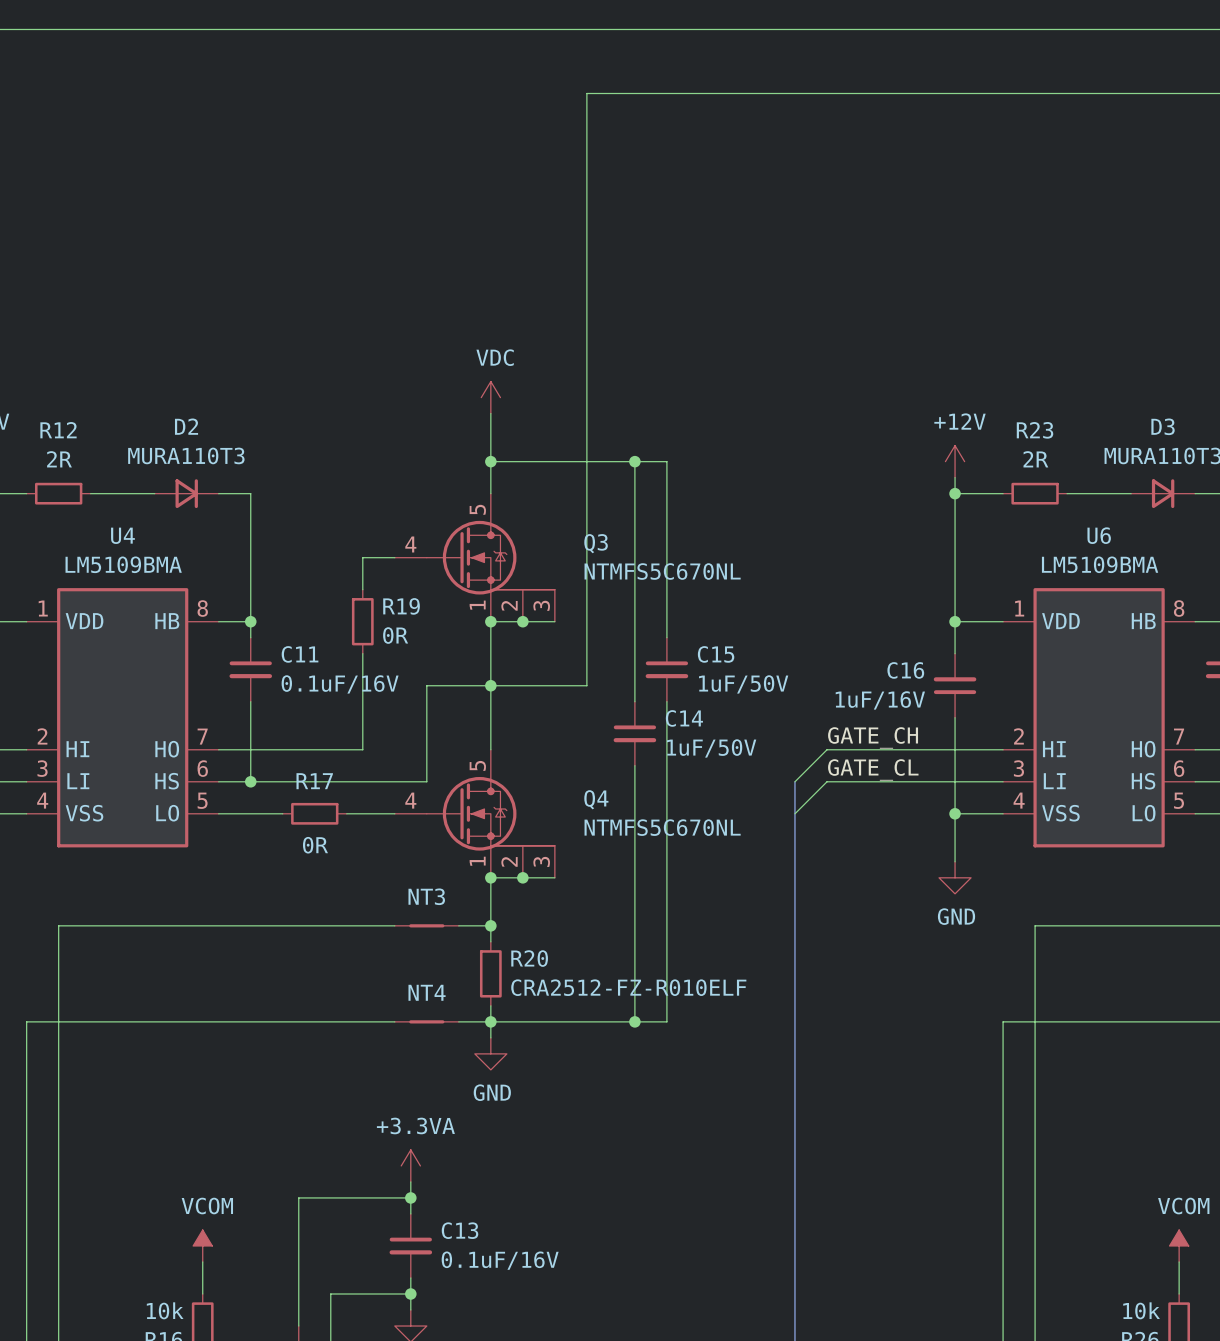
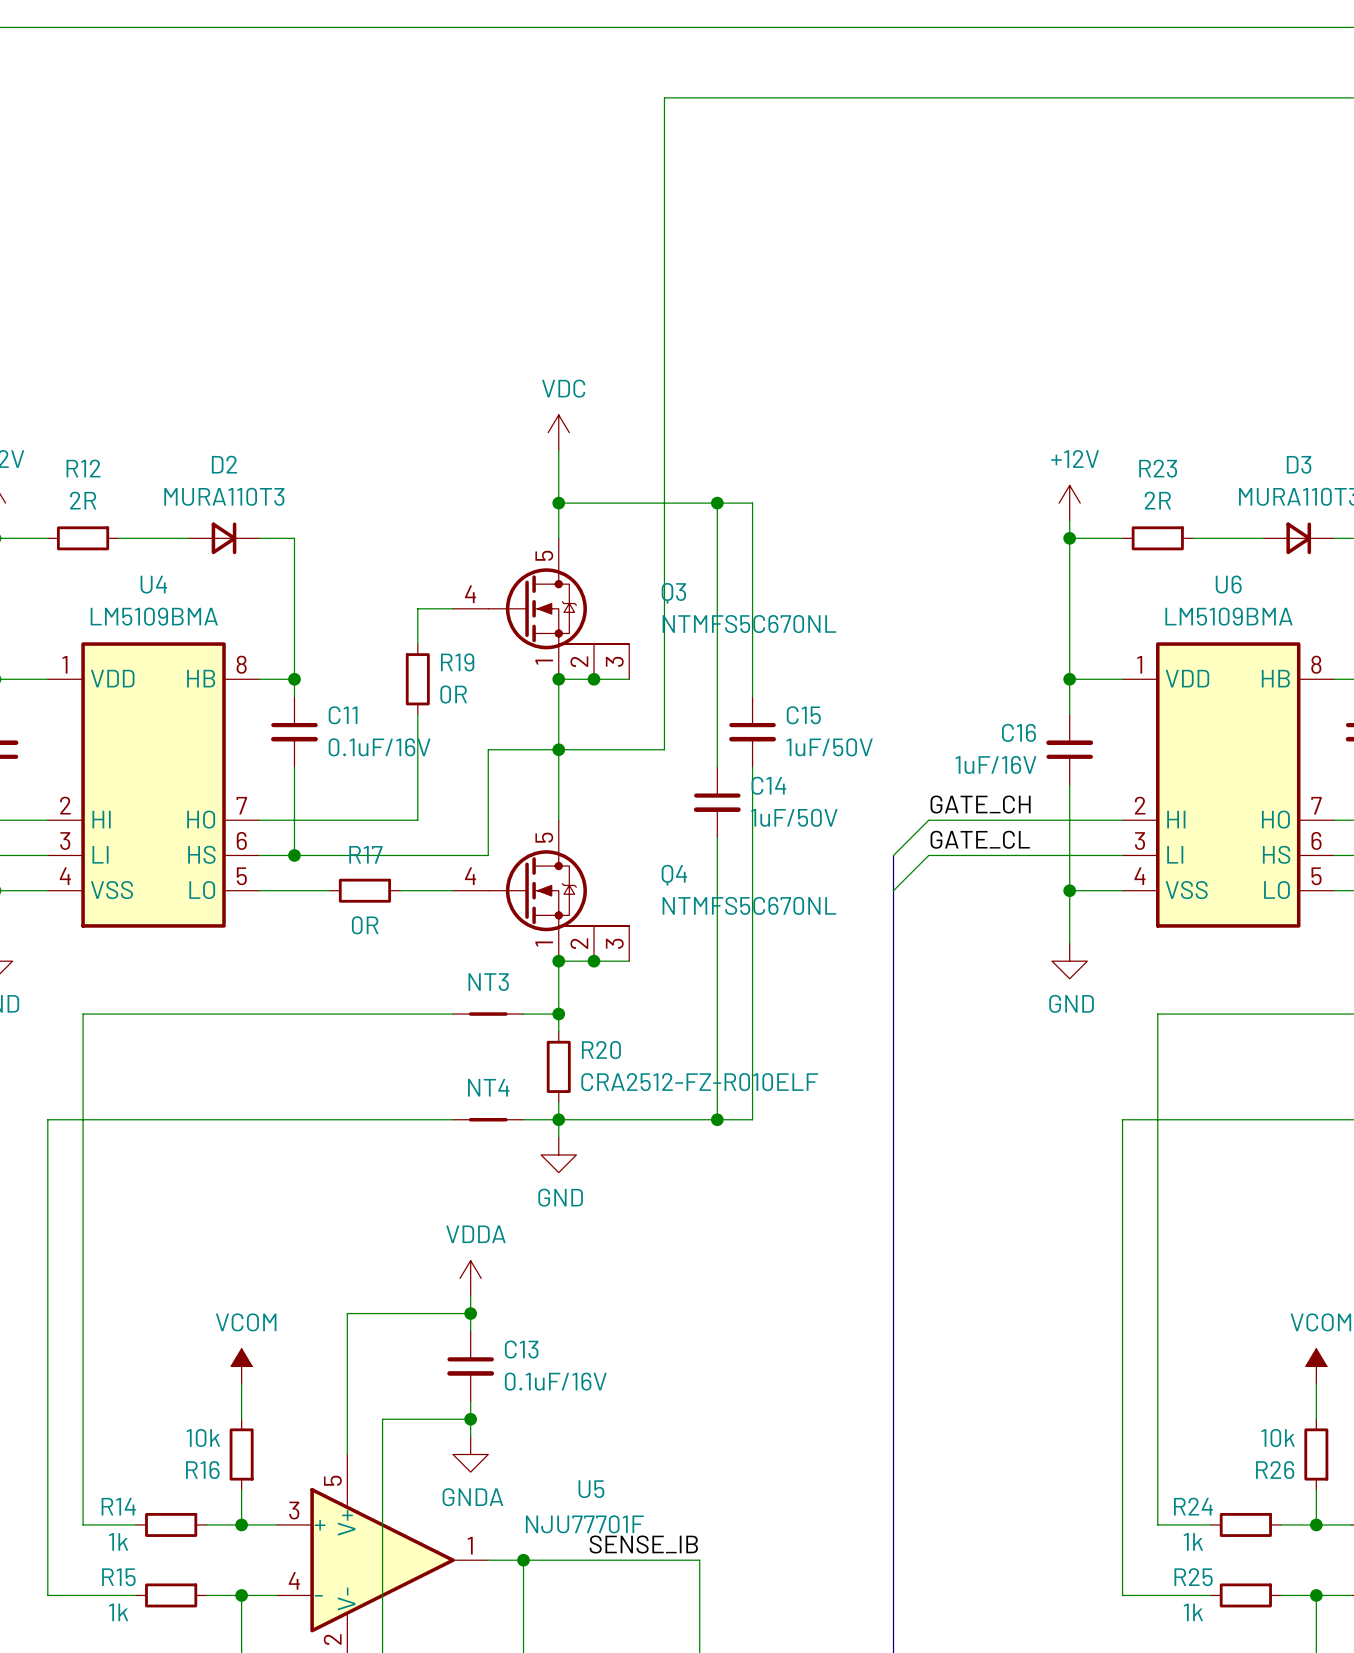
power symbol: +3.3VA (410, 1165) -> VDDA (470, 1278)

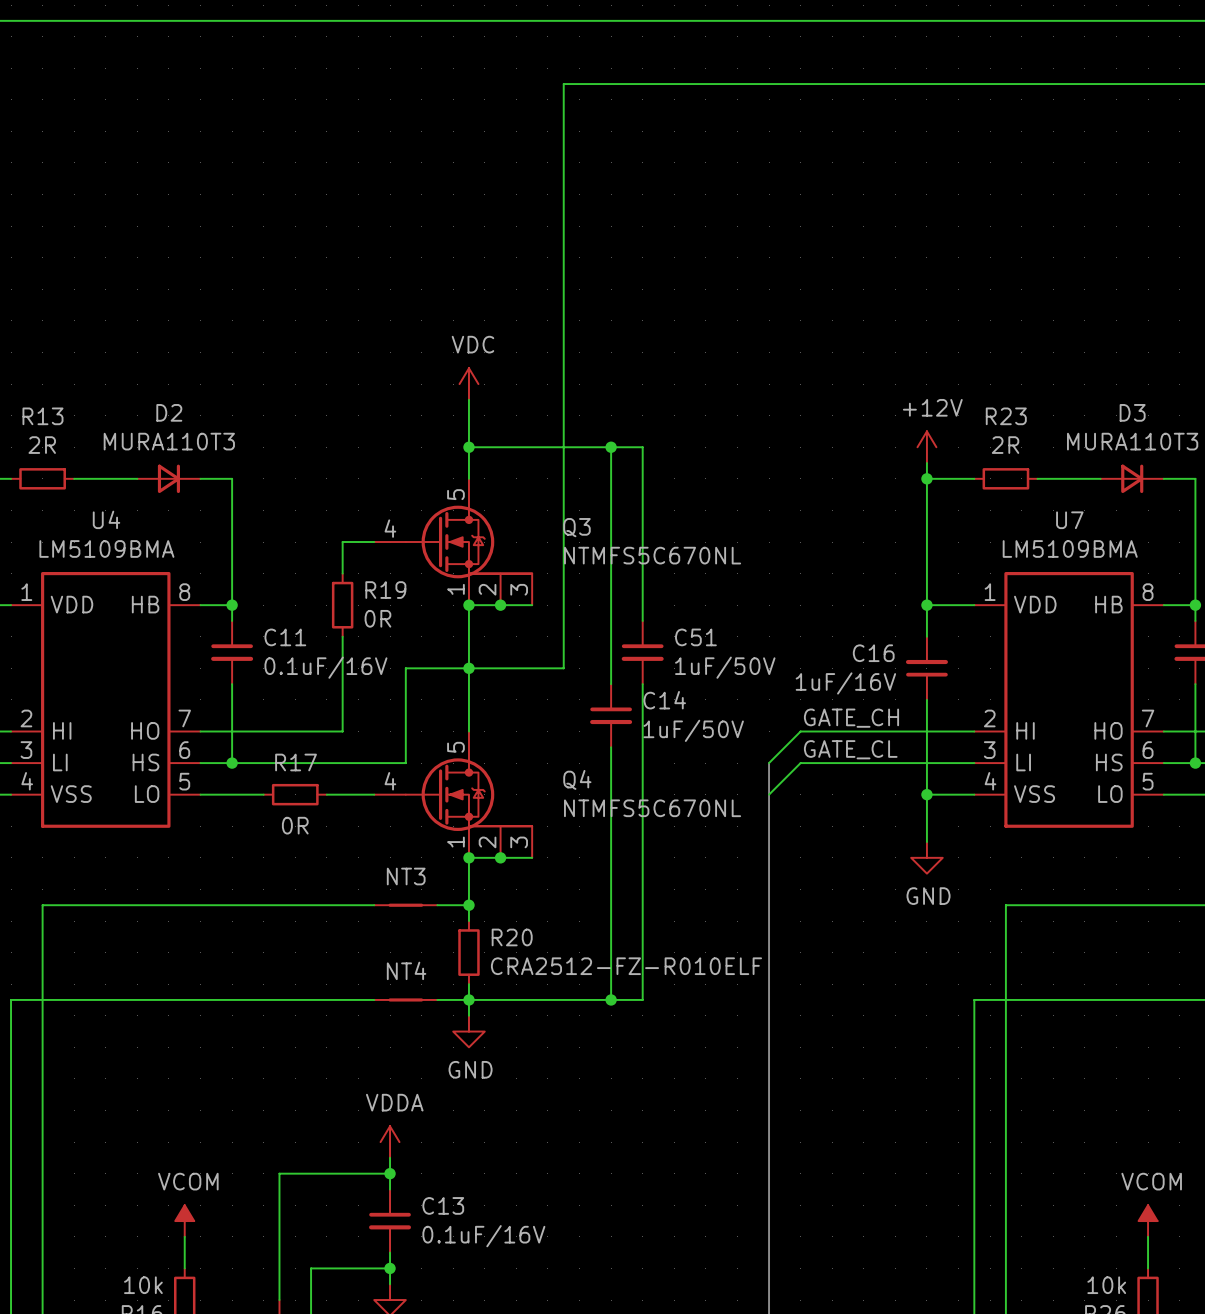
R12 name: R12 (83, 468) -> R13 (42, 416)
U6 name: U6 (1228, 584) -> U7 (1069, 520)
C15 name: C15 (803, 715) -> C51 (695, 637)

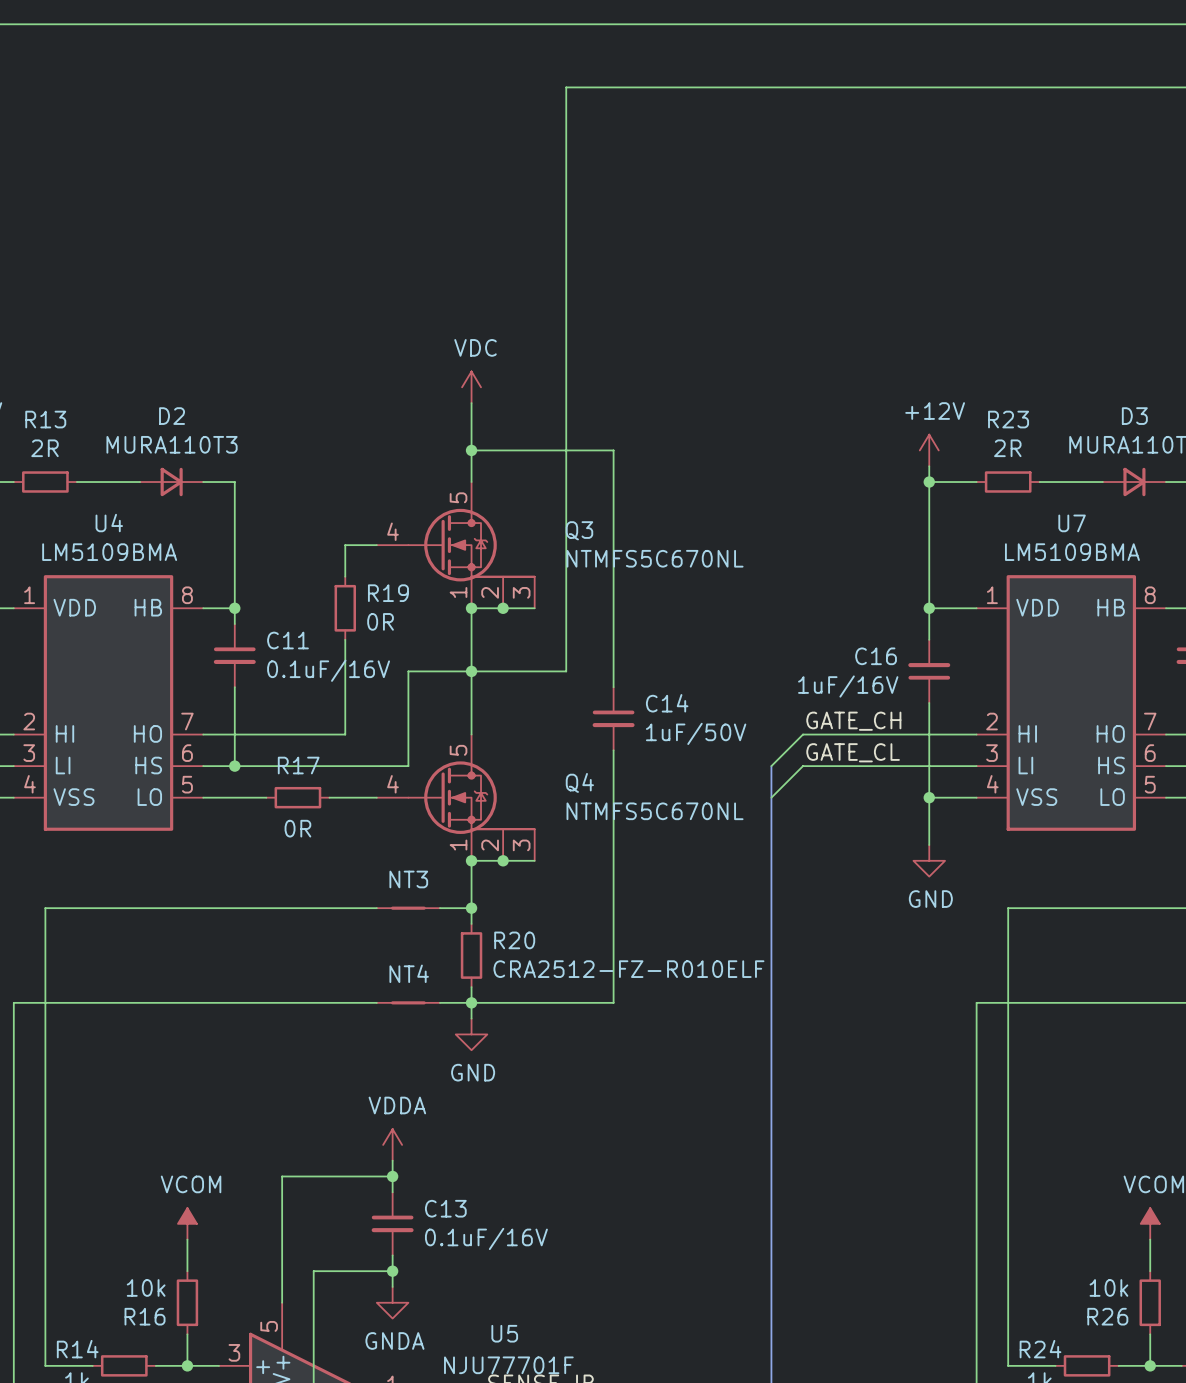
wire: (611, 447) (642, 447) (642, 620) -> none
junction: (611, 447) -> none
C51: 1uF/50V (642, 652) -> none
wire: (642, 684) (642, 999) (611, 999) -> none
junction: (611, 999) -> none

